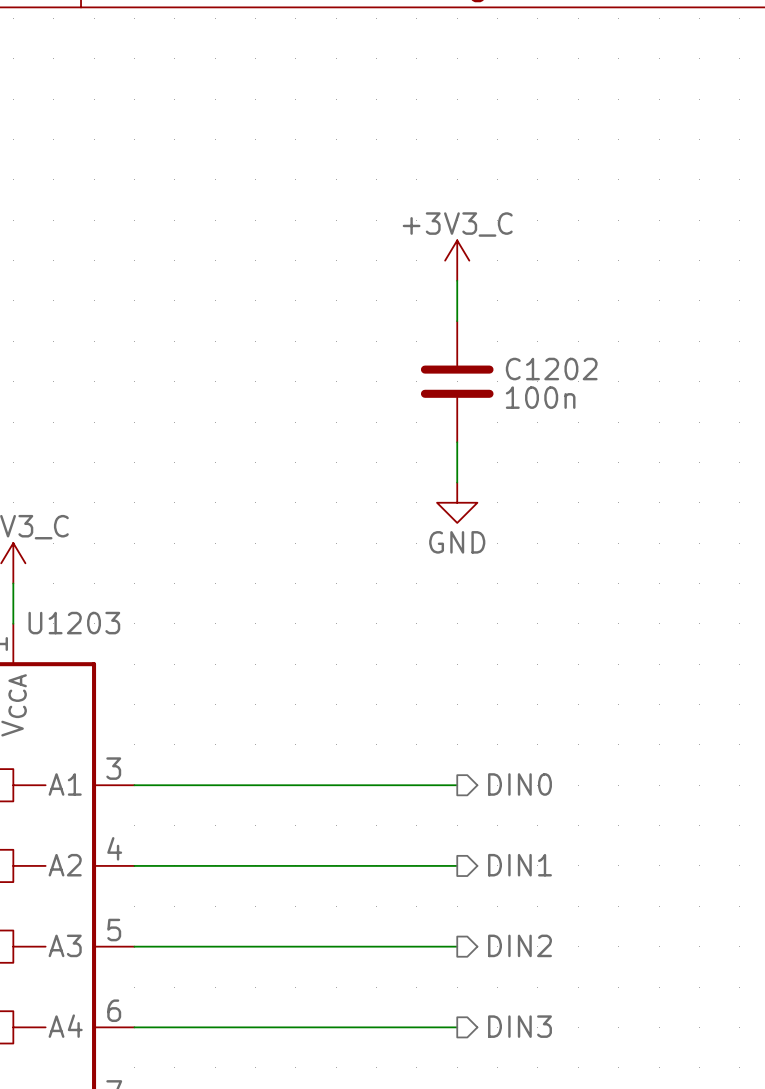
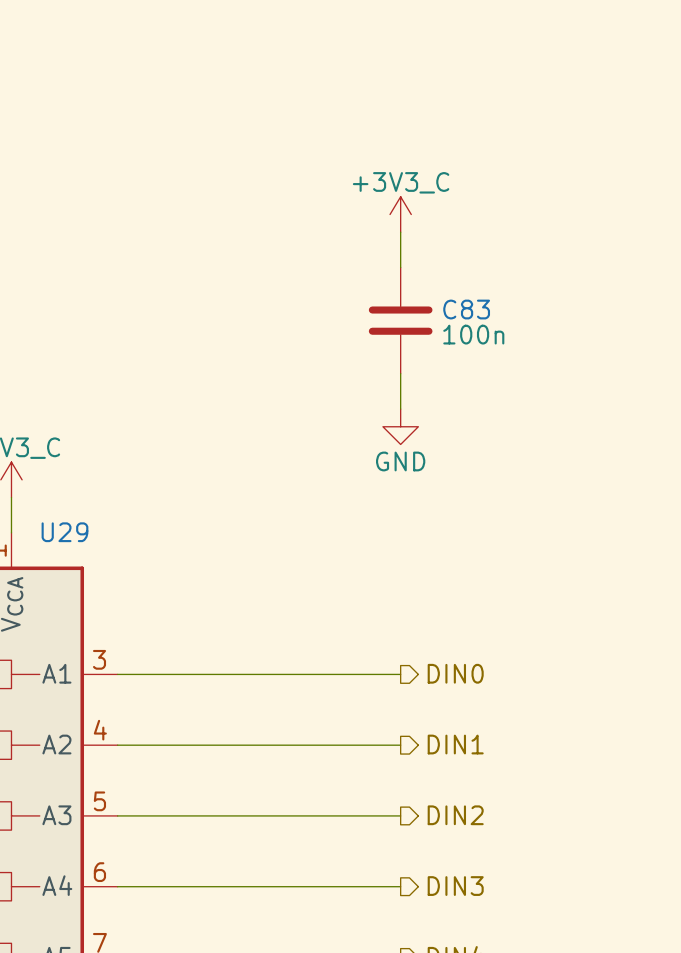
C1202 name: C1202 (551, 369) -> C83 (466, 309)
U1203 name: U1203 (74, 623) -> U29 (64, 532)

